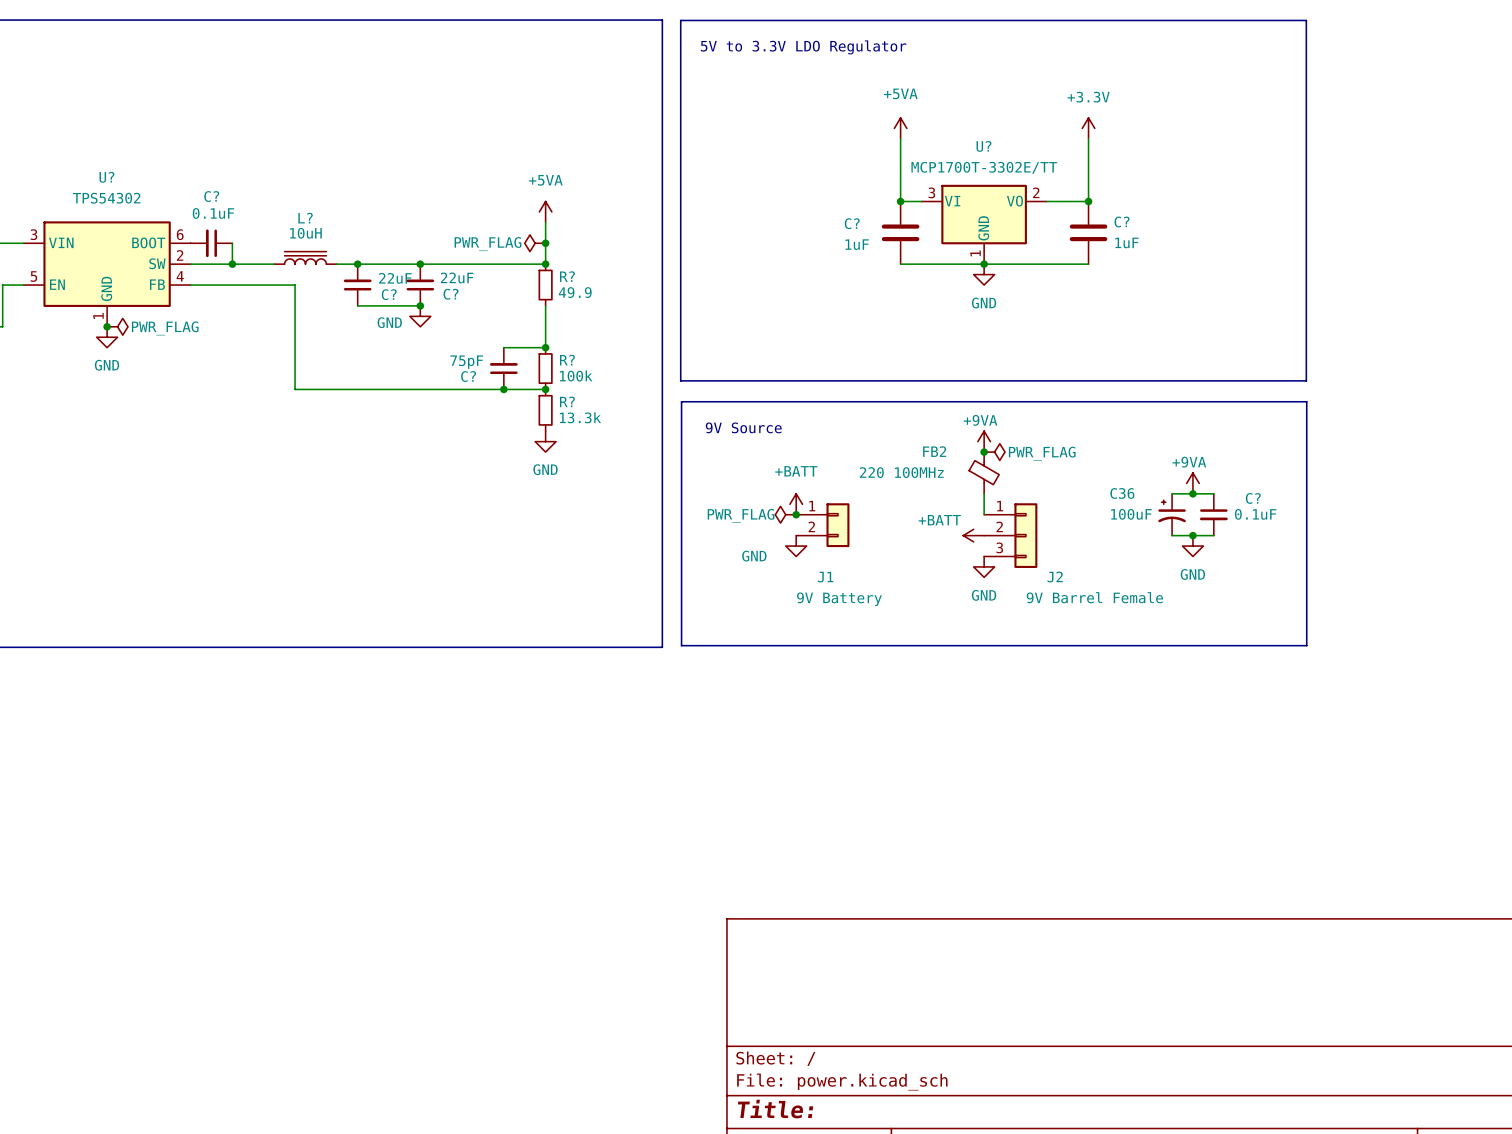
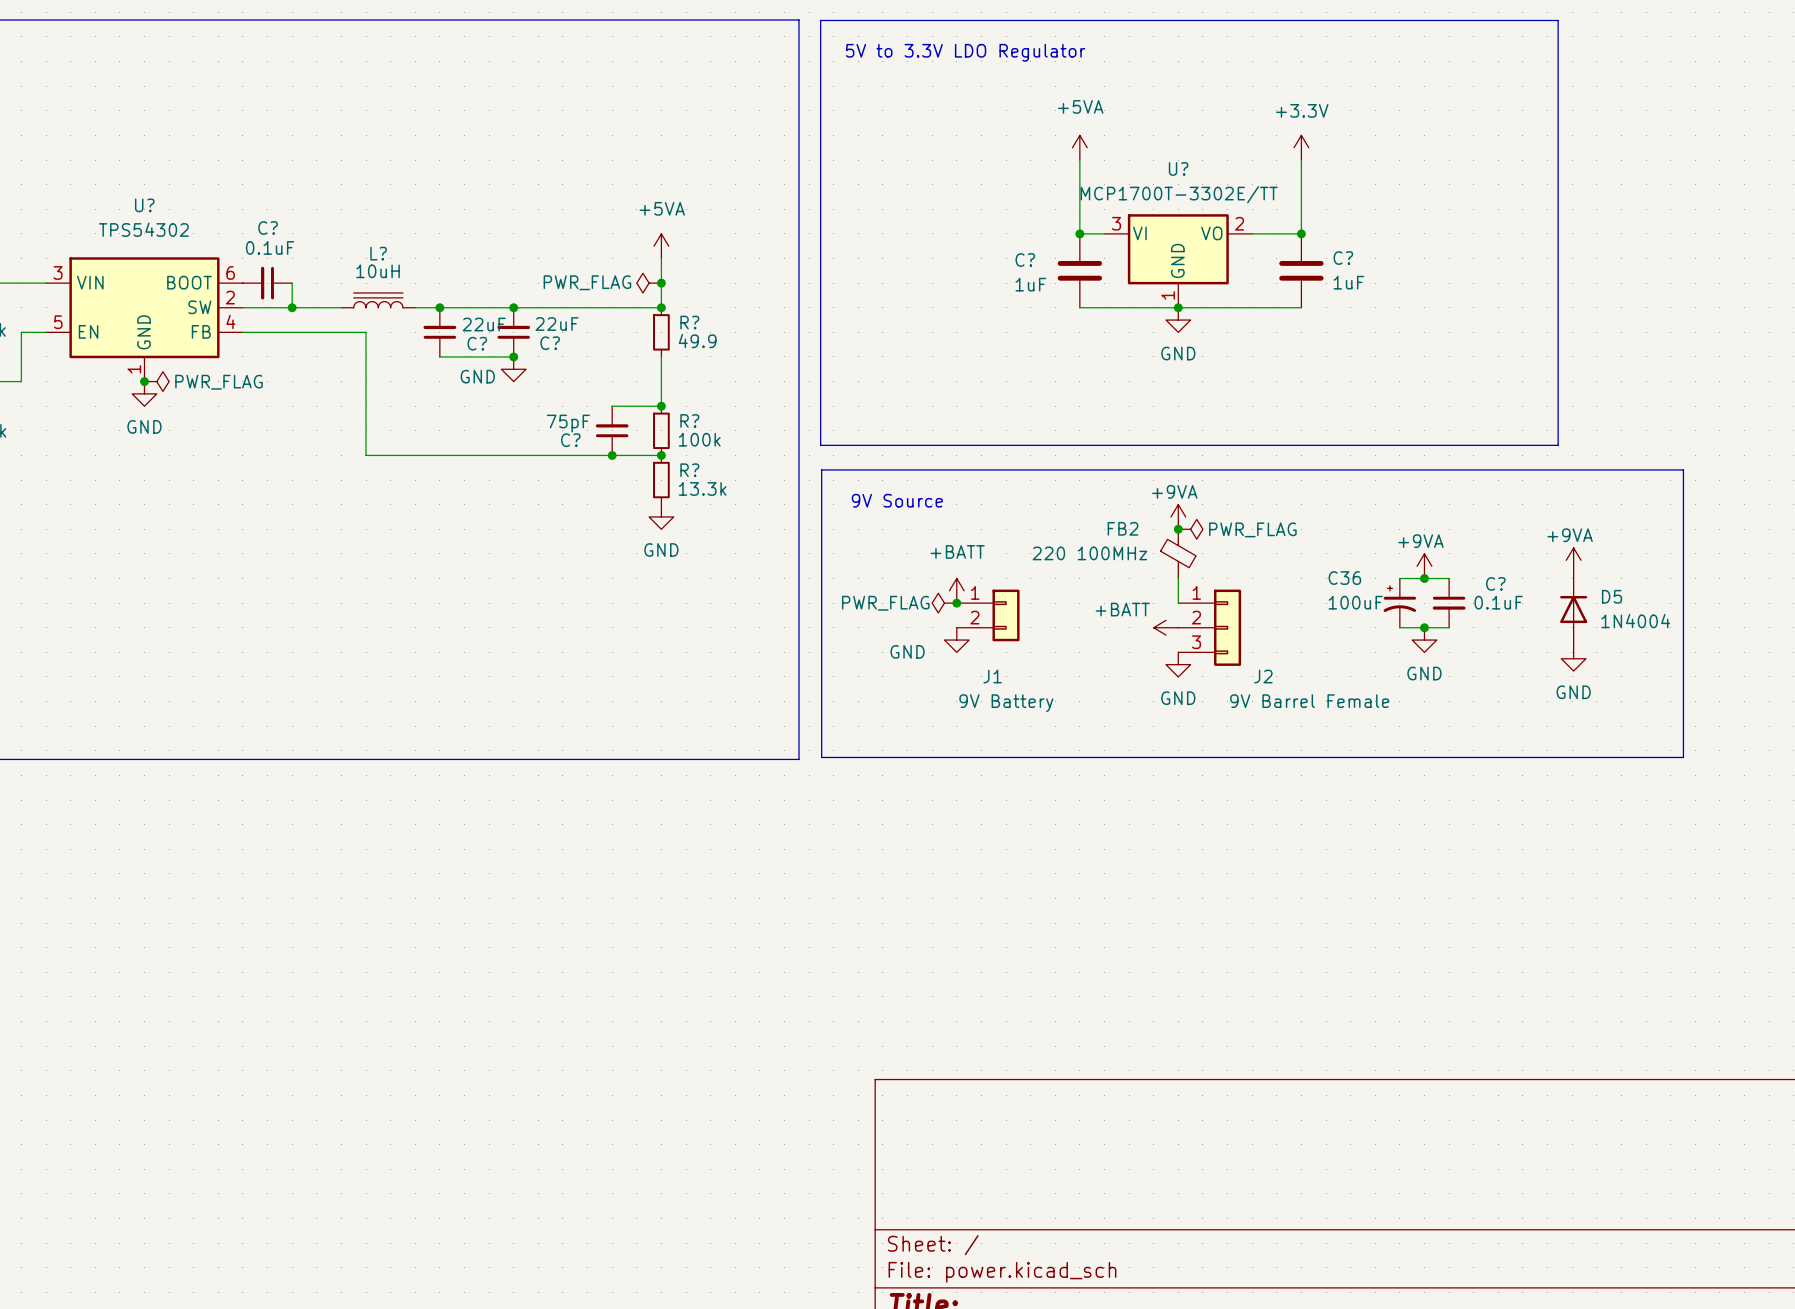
line: (1306, 401) (1306, 645) -> (1558, 469) (1683, 469) (1683, 757) (1558, 757)
power symbol: none -> +9VA (1573, 560)
D5: none -> 1N4004 (1573, 609)
power symbol: none -> GND (1573, 658)

